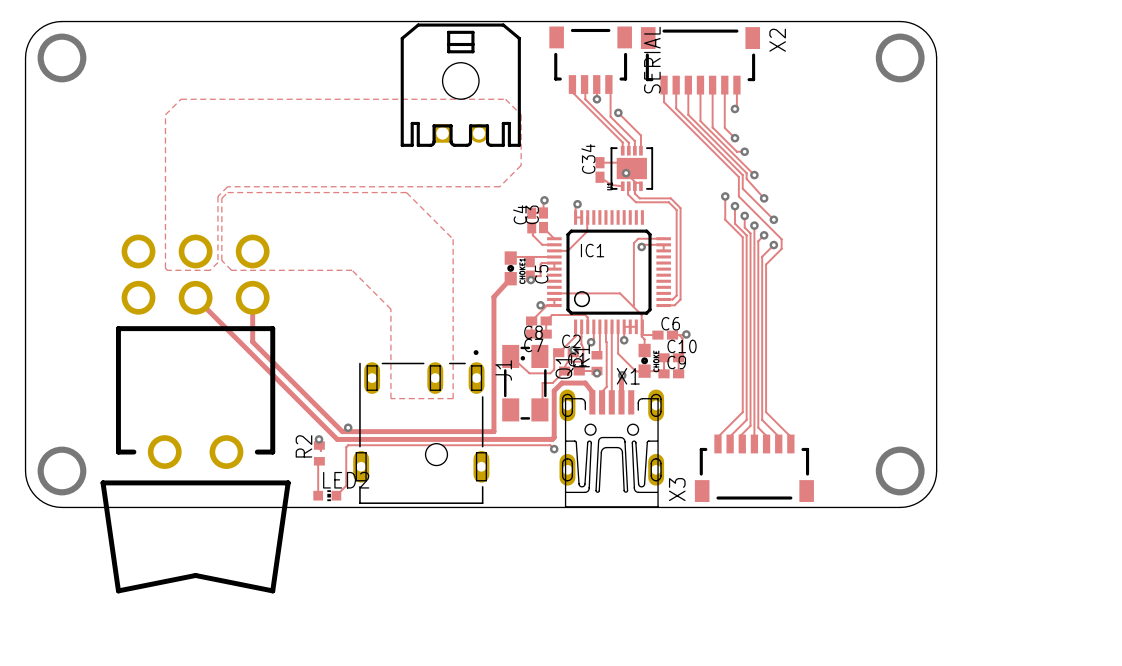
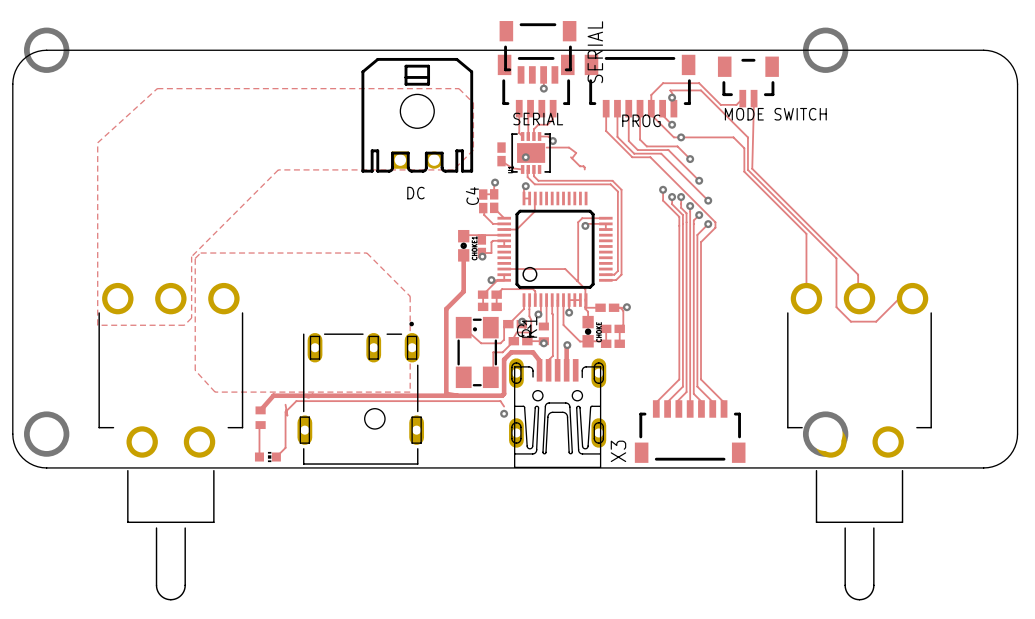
X2: (700, 60) -> none
track: (572, 84) (573, 93) (622, 142) (622, 150) -> none
track: (584, 84) (585, 99) (628, 142) (628, 150) -> none
track: (608, 84) (610, 86) (610, 116) (634, 141) (634, 150) -> none
part position: (460, 85) -> (417, 115)
track: (664, 85) (664, 102) (738, 177) (738, 196) (781, 239) (781, 243) -> (606, 108) (606, 131) (632, 157) (650, 157) (715, 222)
track: (676, 85) (676, 108) (742, 175) (742, 188) -> (617, 108) (617, 136) (634, 153) (661, 153) (679, 171)
track: (688, 85) (688, 114) (746, 173) (746, 178) (764, 198) -> (628, 103) (628, 141) (637, 150) (668, 150) (699, 180)
track: (700, 85) (700, 120) -> none
track: (712, 85) (712, 106) -> (742, 98) (736, 104) (720, 104) (699, 83) (663, 83) (651, 94)
track: (724, 85) (724, 120) -> none
track: (736, 85) (736, 107) (734, 108) -> none
part: none -> (748, 81)
board edge: (25, 94) (25, 57) (28, 44) (39, 29) (57, 21) (900, 21) (914, 24) (929, 35) (935, 48) (936, 57) (936, 471) (933, 484) (925, 496) (914, 504) (900, 507) -> (12, 84) (15, 71) (22, 60) (33, 52) (46, 50) (983, 50) (996, 52) (1010, 63) (1016, 75) (1017, 84) (1017, 434) (1014, 447) (1004, 460) (988, 467) (825, 467)
part: none -> (536, 86)
part: none -> (640, 86)
zone outline: (181, 99) (165, 114) (165, 268) (167, 270) (210, 270) (217, 262) (217, 196) (227, 186) (311, 186) -> (157, 88) (97, 142) (97, 325) (184, 325) (191, 318) (191, 256) (278, 169)
track: none -> (754, 98) (752, 168) (858, 274) (859, 298)
track: (618, 112) (640, 135) (640, 150) -> none
via: (618, 112) -> none
track: none -> (519, 108) (519, 133) (522, 136)
track: none -> (530, 108) (528, 110) (528, 136)
track: none -> (553, 108) (552, 119) (547, 124) (538, 124) (533, 129) (533, 136)
track: none -> (673, 108) (673, 95) (670, 90) (701, 90) (747, 137) (747, 169) (836, 258) (836, 307) (850, 321) (876, 321) (899, 298) (912, 298)
track: (700, 121) (740, 161) -> (640, 108) (640, 139) (646, 146) (677, 146)
text: none -> MODE SWITCH (775, 114)
text: none -> SERIAL (538, 119)
text: none -> PROG (641, 120)
track: none -> (539, 136) (548, 136) (552, 141)
track: none -> (681, 137) (733, 137) (744, 148) (744, 171) (806, 233) (806, 298)
via: none -> (552, 141)
part position: (631, 168) -> (531, 152)
part: none -> (501, 154)
C34: (600, 169) -> none
via: none -> (525, 157)
via: (626, 173) -> none
track: (600, 177) (611, 185) (622, 186) -> (501, 161) (512, 168) (522, 169)
track: (628, 186) (628, 194) (635, 202) -> (528, 169) (527, 177) (534, 184) (579, 184)
track: (634, 186) (634, 193) (639, 198) -> (533, 169) (533, 176) (538, 180) (583, 180)
track: (725, 196) (725, 208) -> none
via: (725, 196) -> none
track: (734, 206) (734, 215) -> none
via: (734, 206) -> none
via: none -> (663, 189)
text: none -> DC (415, 193)
C3 name: C3 (532, 214) -> none
via: none -> (672, 197)
IC1 name: IC1 (592, 250) -> none
C5 name: C5 (541, 274) -> none
track: (510, 278) (493, 296) (493, 431) (342, 431) (252, 341) (252, 297) -> (463, 255) (463, 291) (446, 309) (446, 393) (457, 395)
track: (195, 297) (337, 439) (552, 439) (554, 437) (554, 427) -> (260, 410) (273, 395) (502, 395) (504, 393)
zone outline: (453, 322) (453, 239) (406, 192) (227, 192) (221, 198) (221, 260) (231, 270) (352, 270) (390, 309) (390, 398) (453, 398) -> (410, 296) (366, 253) (200, 253) (195, 258) (195, 370) (215, 392) (410, 392) (410, 366)
C6 name: C6 (670, 323) -> none
C8 name: C8 (533, 332) -> none
C2 name: C2 (571, 341) -> none
C7 name: C7 (533, 345) -> none
C10 name: C10 (682, 346) -> none
C9 name: C9 (676, 362) -> none
Q1 name: Q1 (564, 367) -> none
X1 name: X1 (628, 376) -> none
part: (195, 413) -> none
via: (348, 427) -> none
part: none -> (360, 393)
J1: (421, 427) -> none
via: (319, 439) -> none
track: none -> (504, 406) (500, 401) (296, 401) (285, 411) (285, 447) (276, 457)
track: (554, 449) (550, 445) (348, 445) (346, 447) (346, 485) (336, 495) -> none
part: none -> (260, 417)
R2: (319, 453) -> none
track: (319, 461) (318, 495) -> (260, 425) (259, 457)
part: none -> (170, 441)
part: none -> (859, 441)
part: none -> (267, 457)
LED2: (327, 495) -> none

